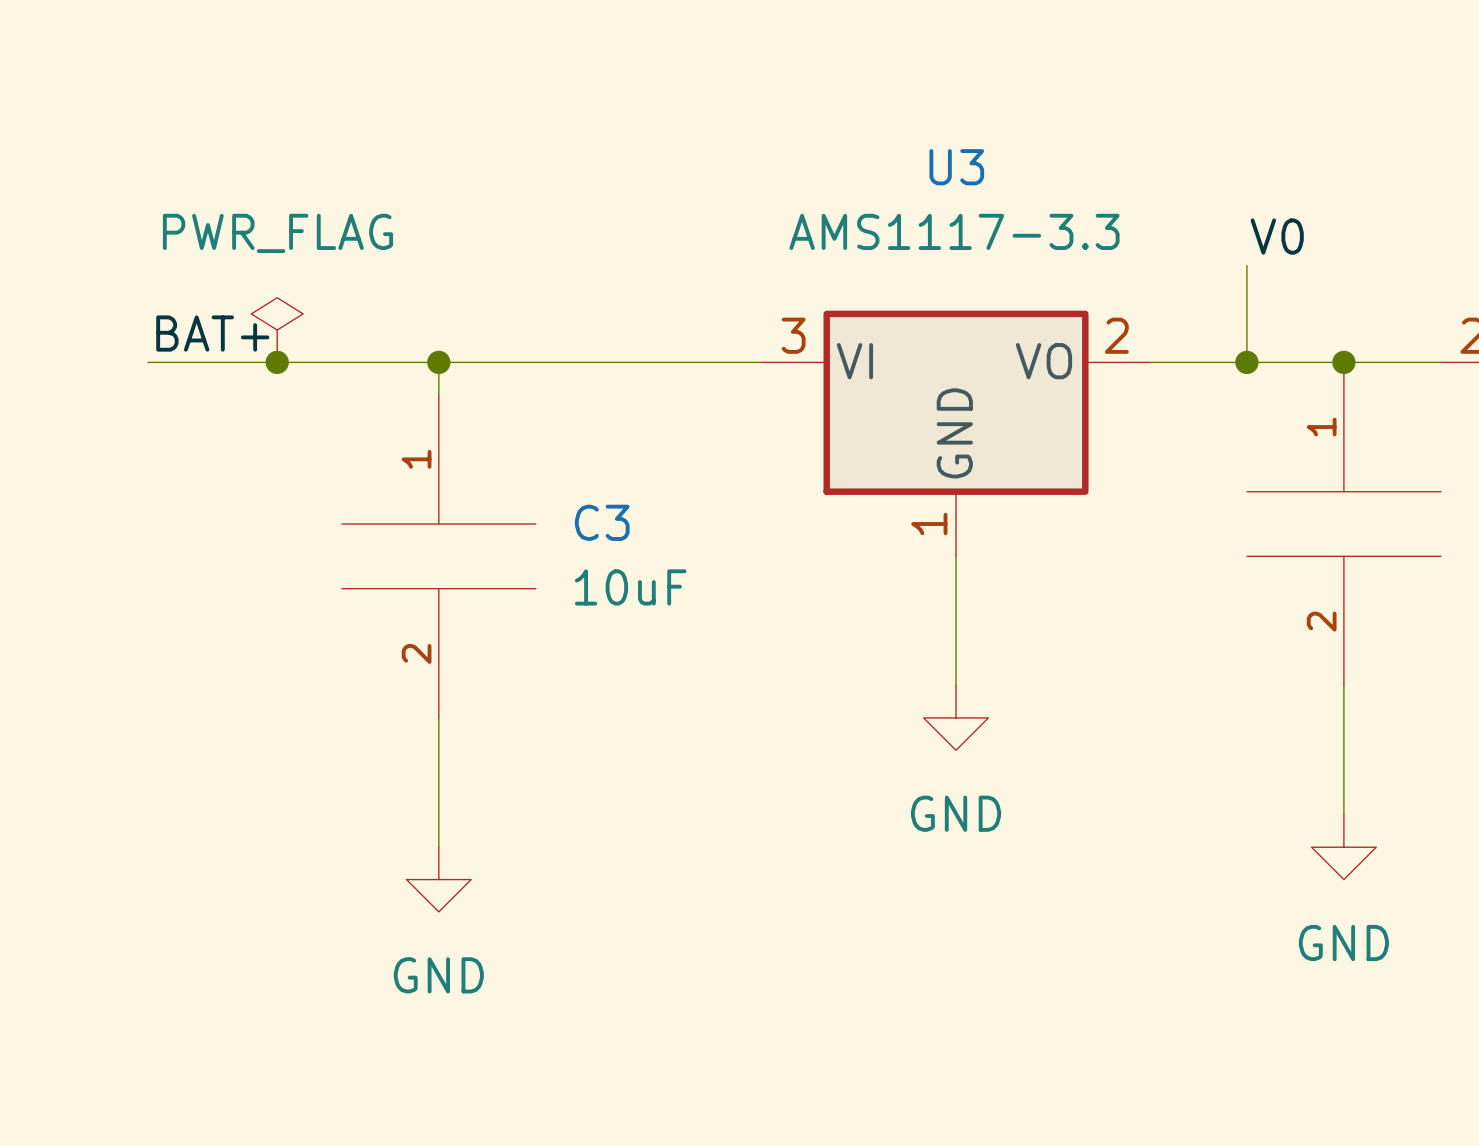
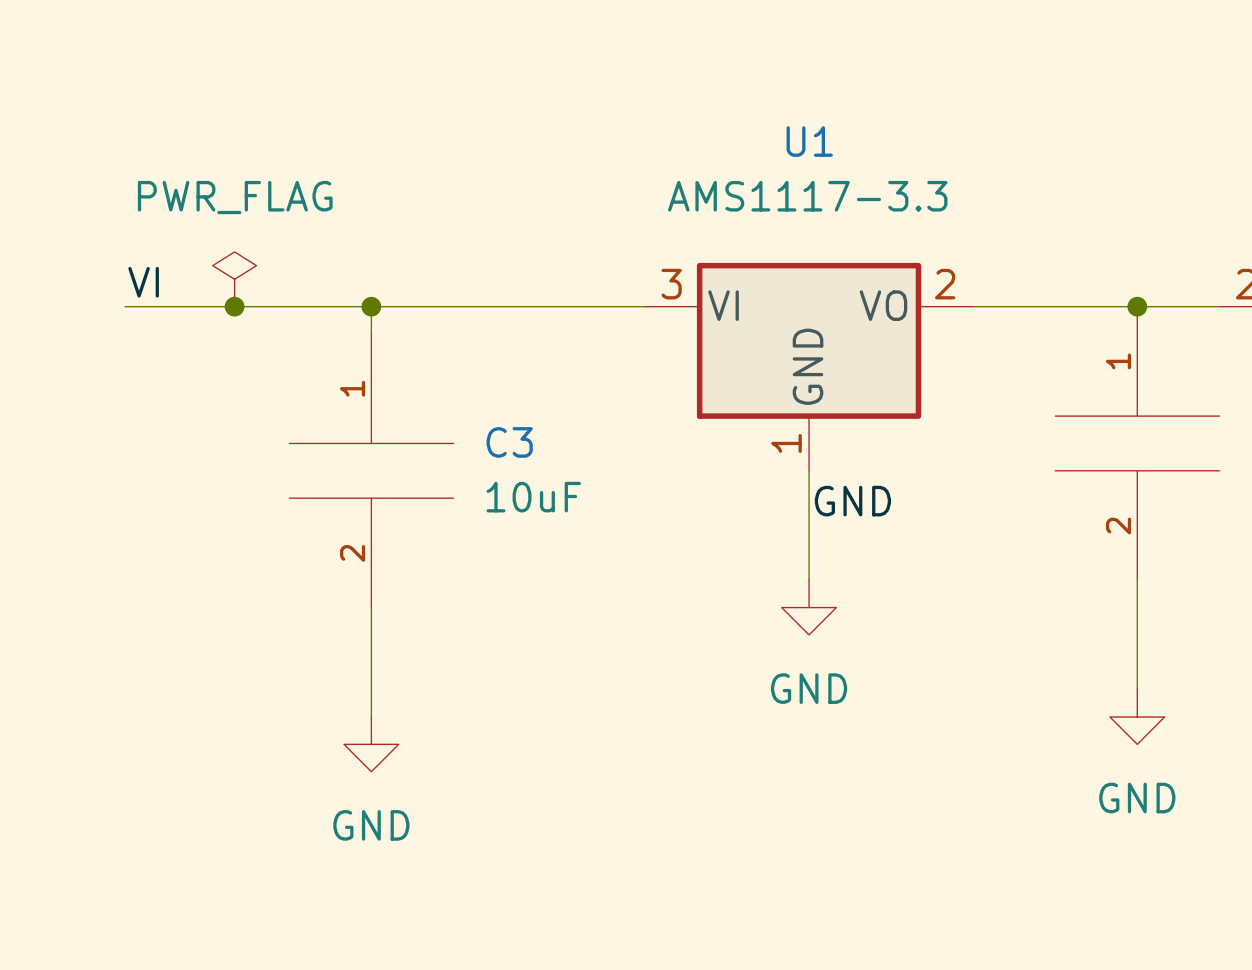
U3 name: U3 (956, 167) -> U1 (809, 141)
label: V0 (1277, 236) -> none
wire: (1246, 265) (1246, 362) -> none
label: BAT+ (212, 333) -> VI (143, 282)
junction: (1246, 362) -> none
label: none -> GND (852, 501)

